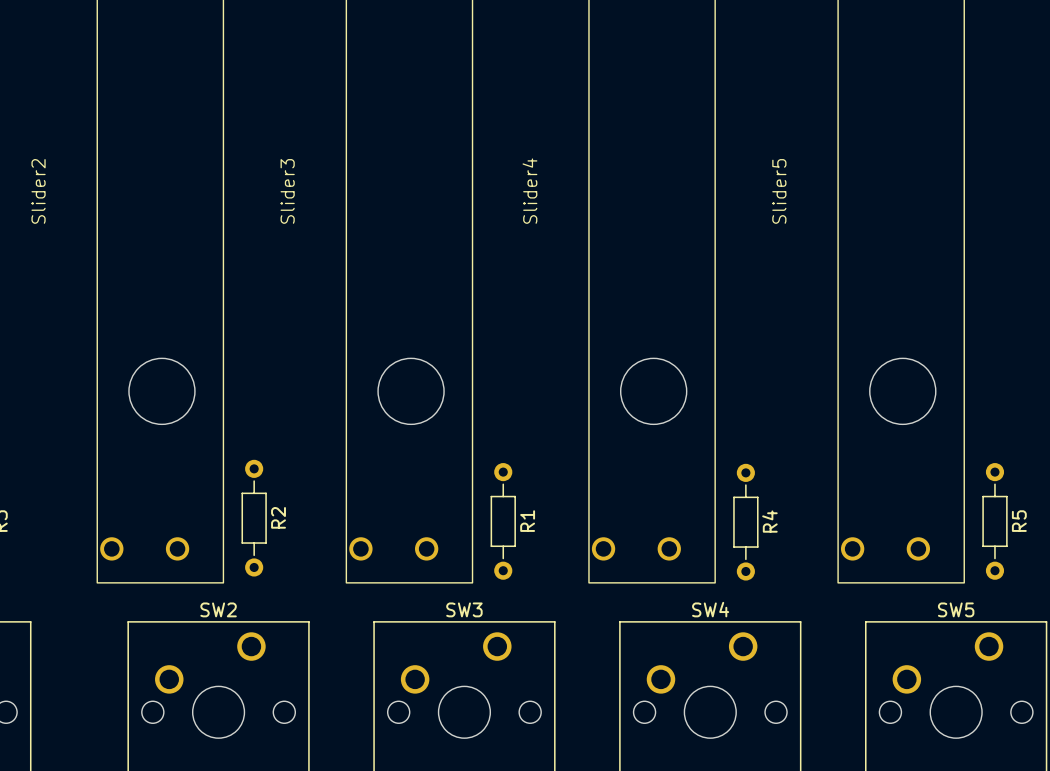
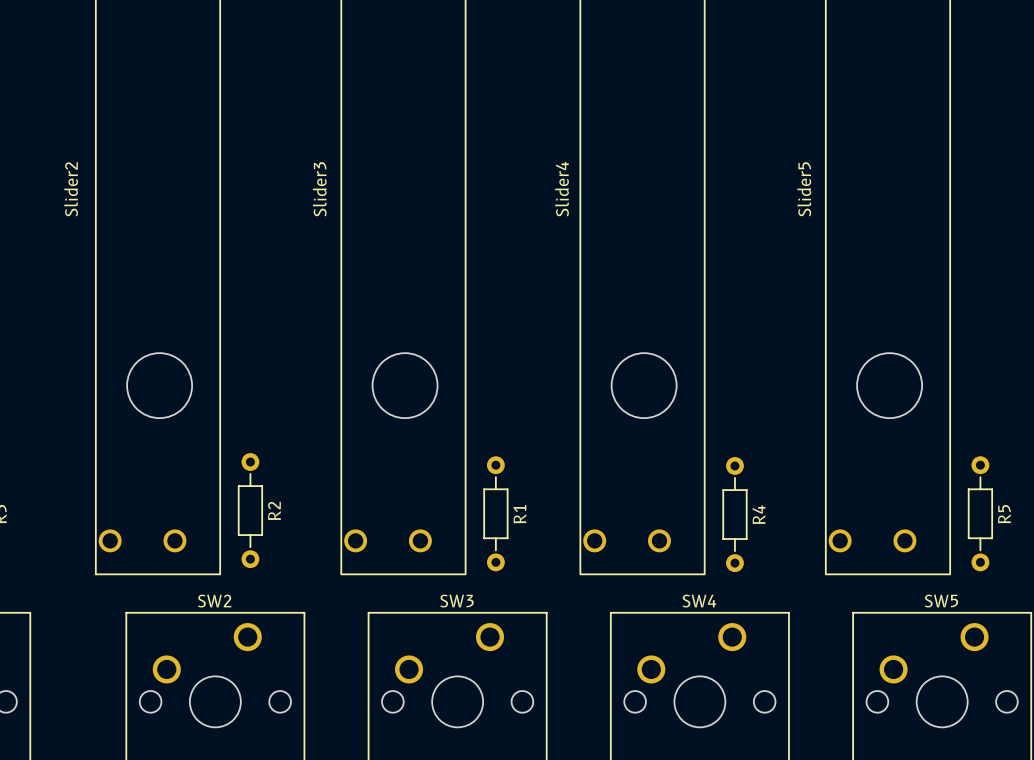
Slider2 name position: Slider2 (38, 191) -> Slider2 (71, 189)
Slider3 name position: Slider3 (287, 191) -> Slider3 (319, 189)
Slider4 name position: Slider4 (529, 191) -> Slider4 (562, 189)
Slider5 name position: Slider5 (779, 191) -> Slider5 (804, 189)

